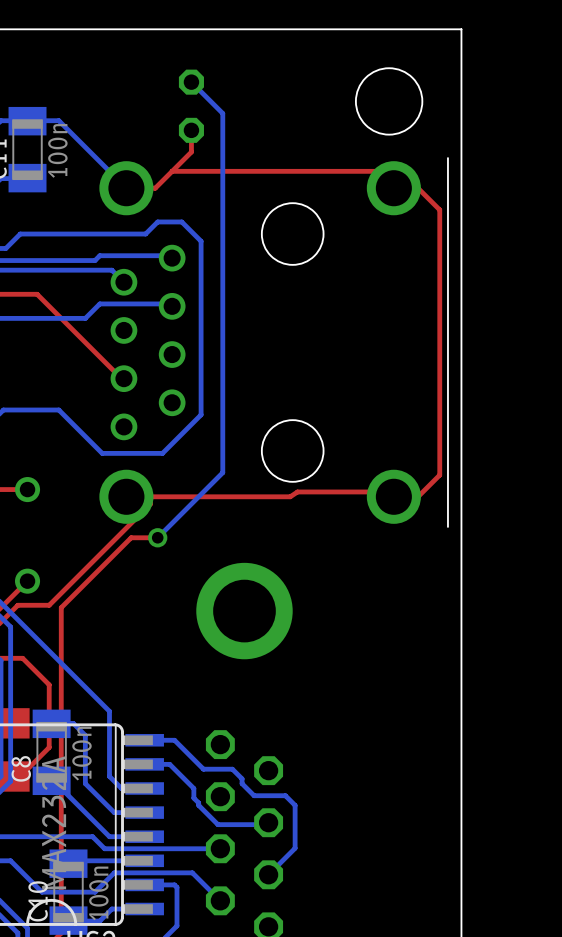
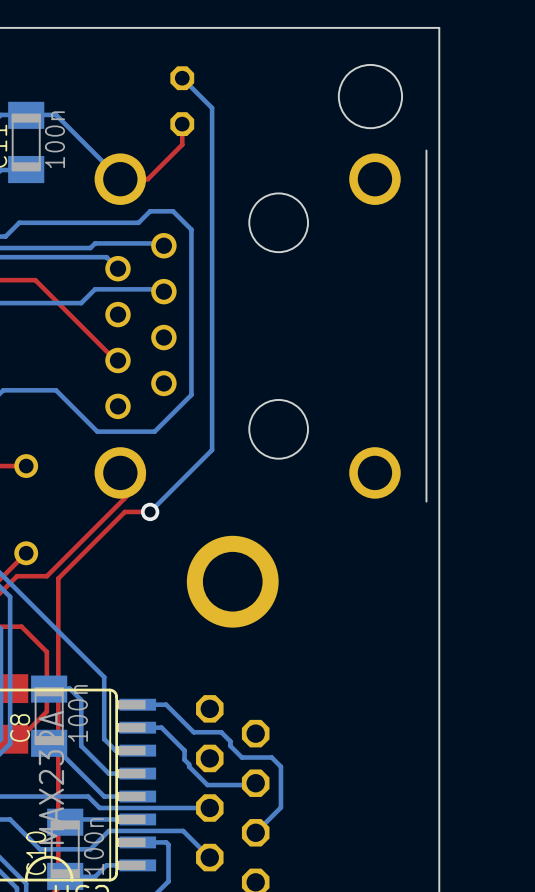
top track: (172, 171) (398, 171) (415, 188) -> none
top track: (418, 188) (439, 209) (439, 475) (418, 496) (391, 496) (384, 491) (297, 491) (290, 496) (150, 496) -> none

